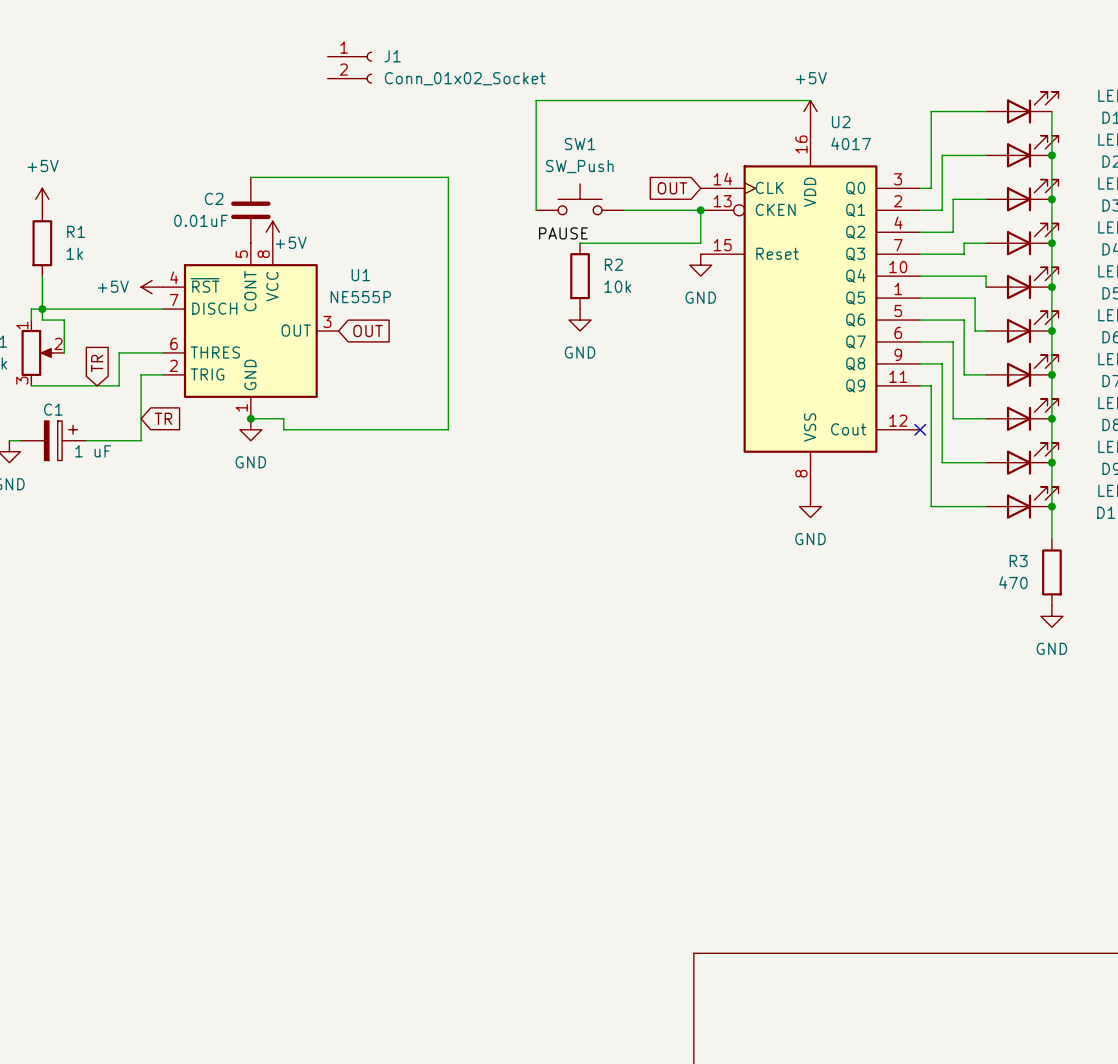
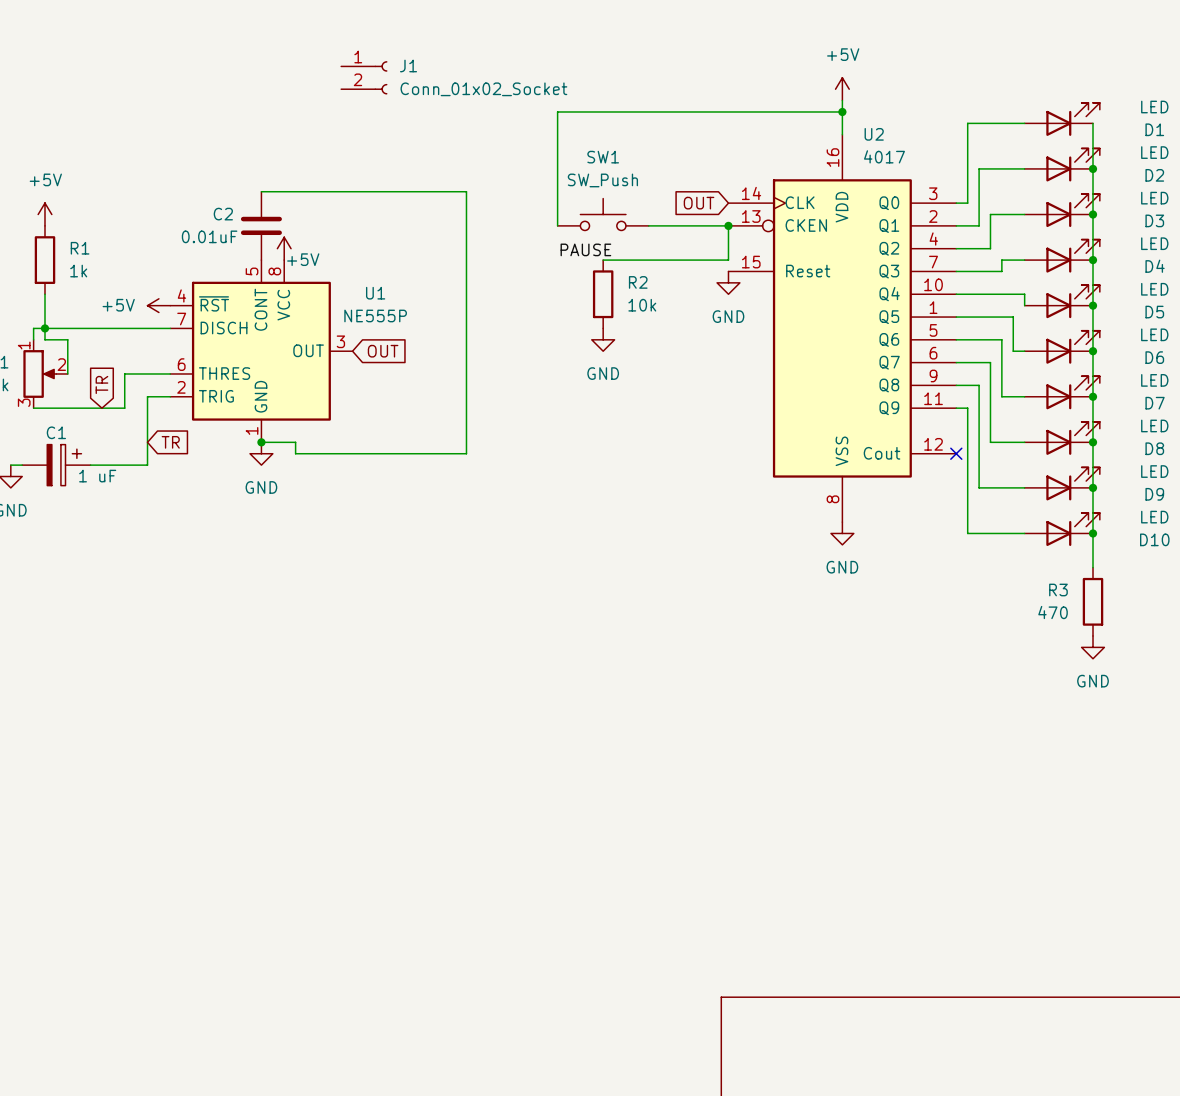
junction: none -> (842, 111)
power symbol position: +5V (810, 111) -> +5V (842, 89)

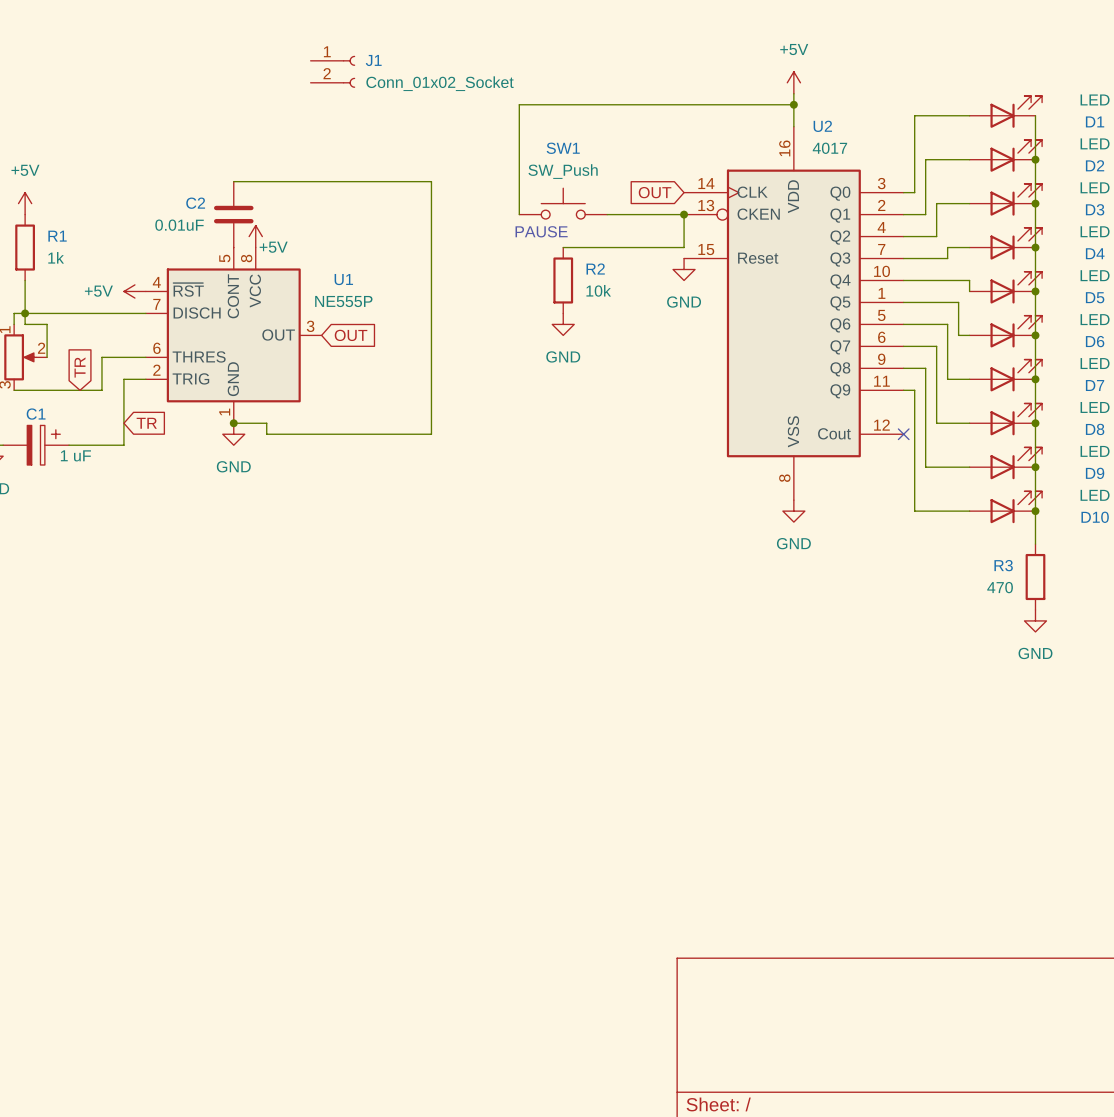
text: none -> PAUSE (541, 231)
label: PAUSE (585, 249) -> none

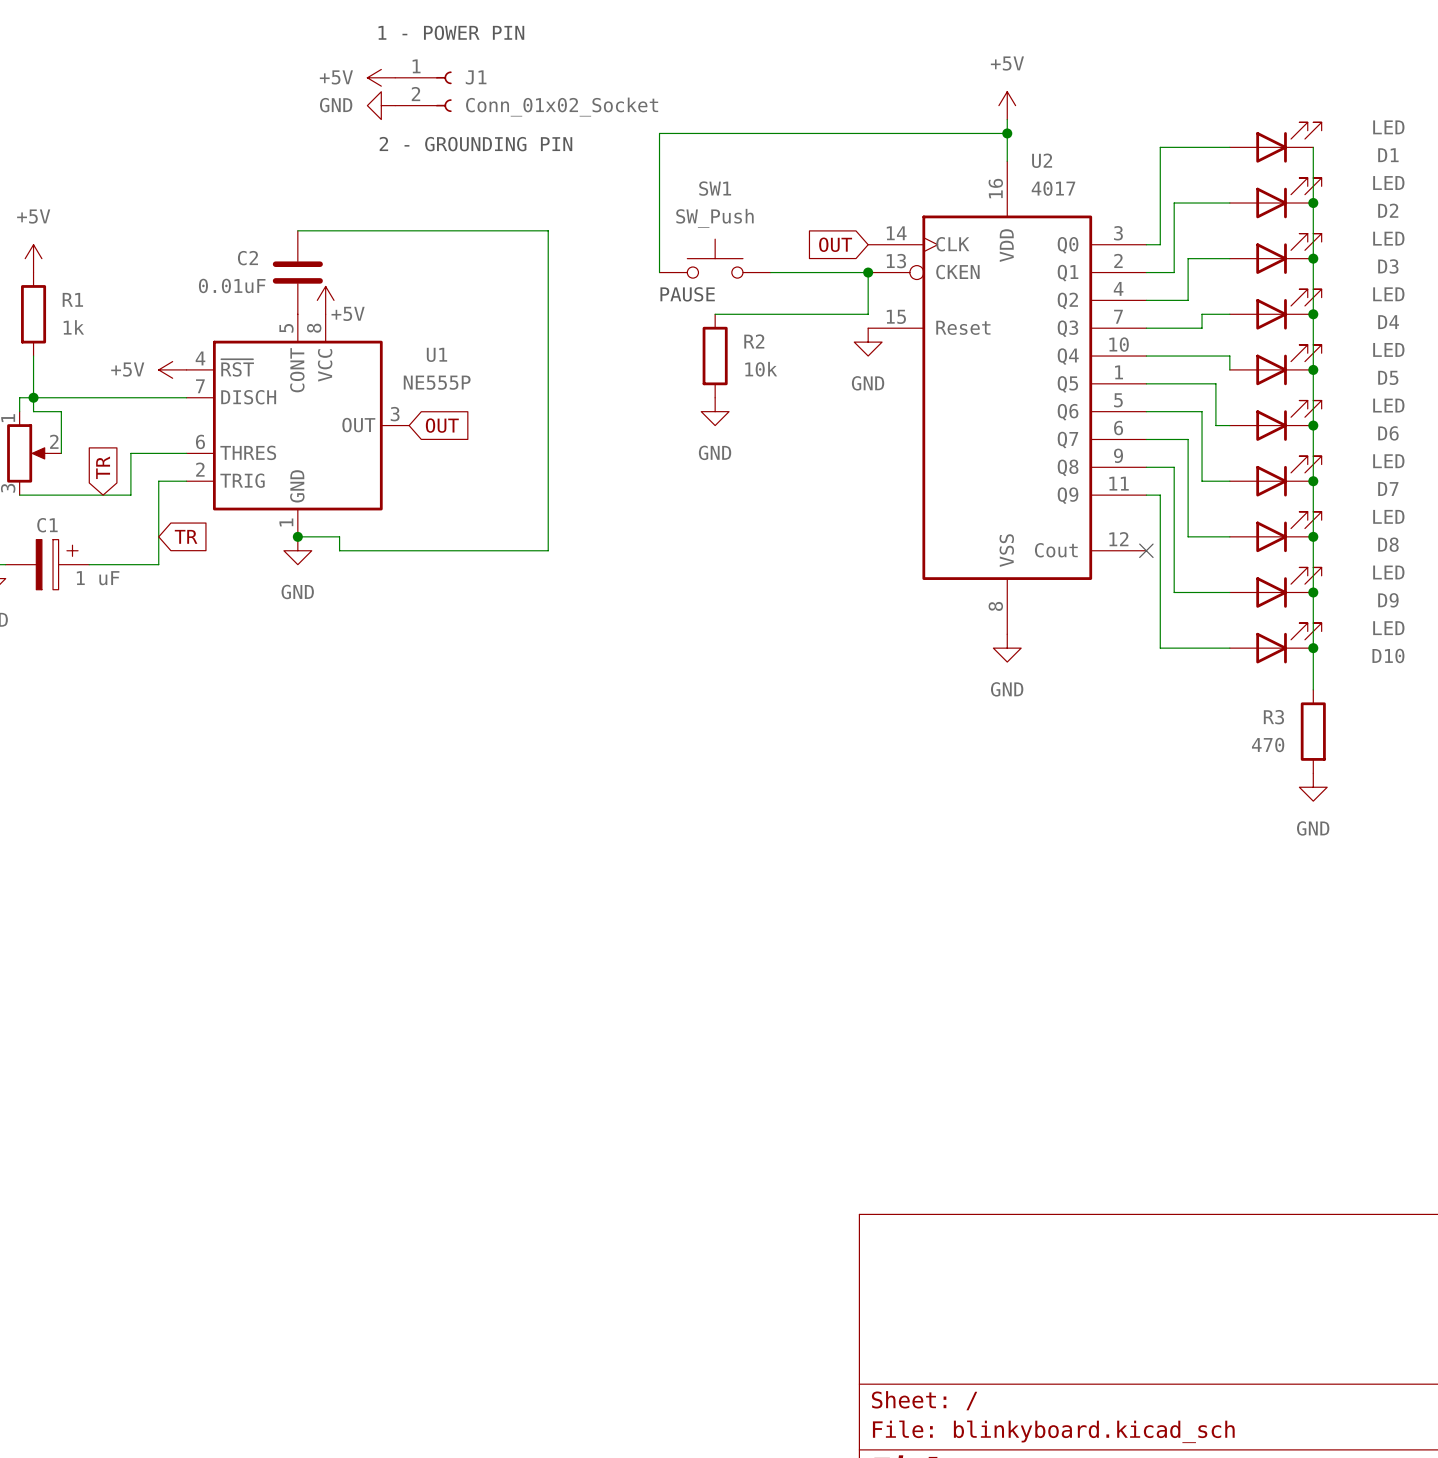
text: none -> 1 - POWER PIN (451, 32)
power symbol: none -> +5V (381, 77)
power symbol: none -> GND (381, 105)
text: none -> 2 - GROUNDING PIN (475, 144)

